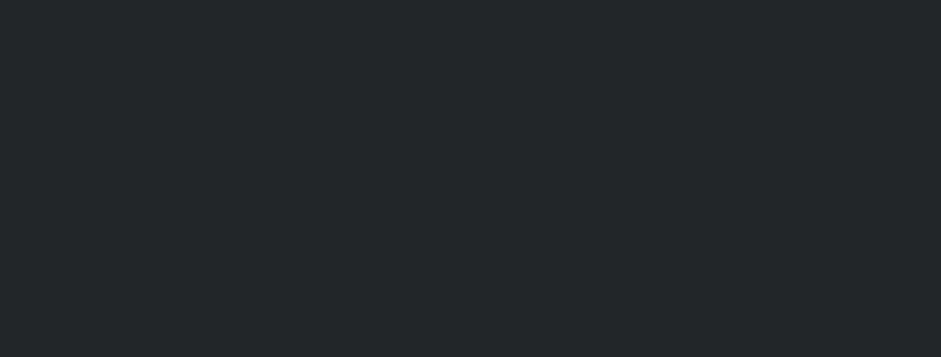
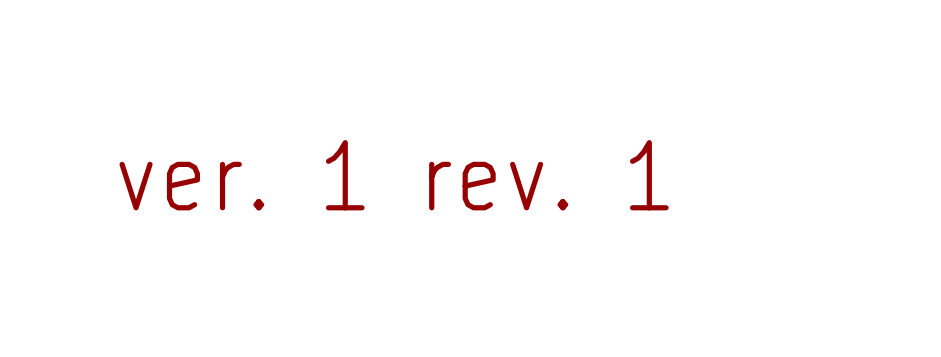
text: none -> ver. 1 rev. 1 (394, 175)

